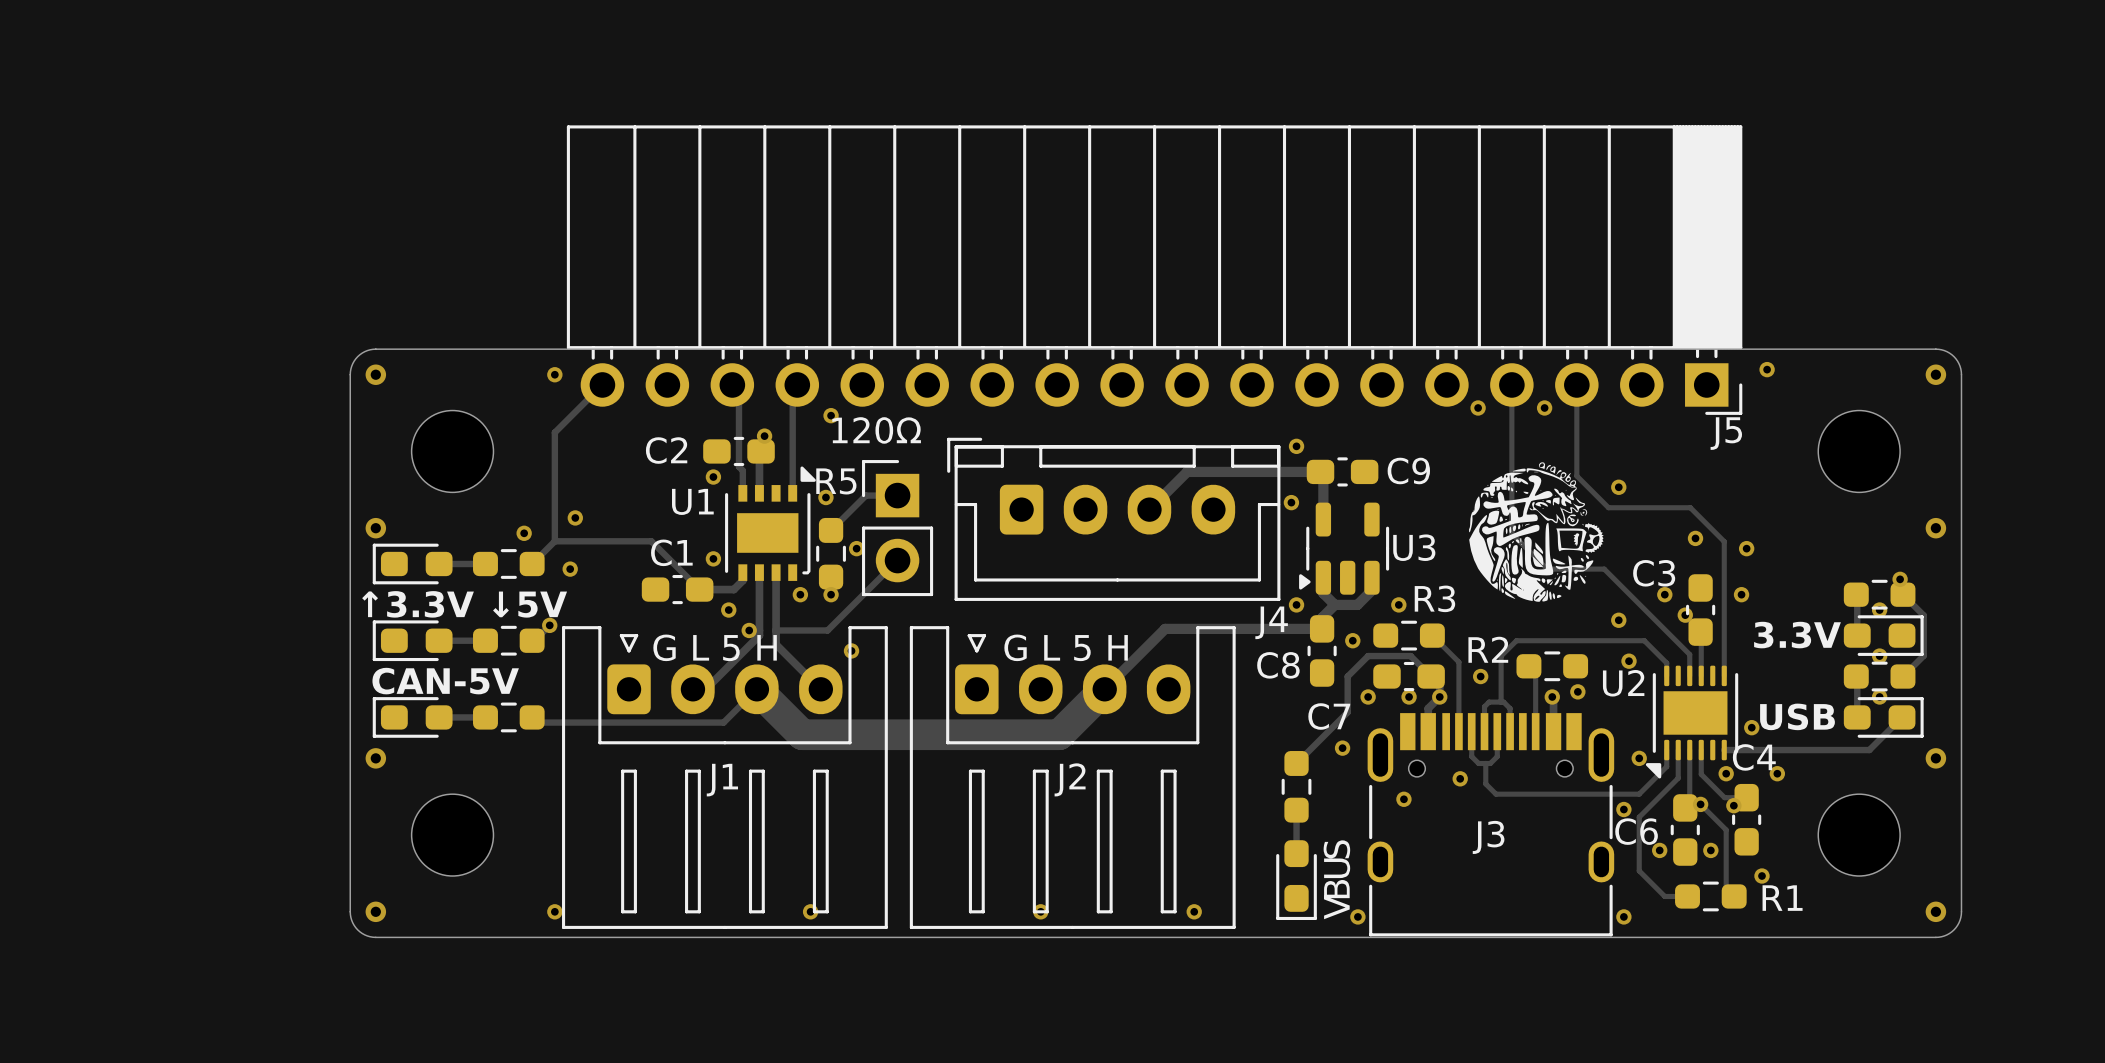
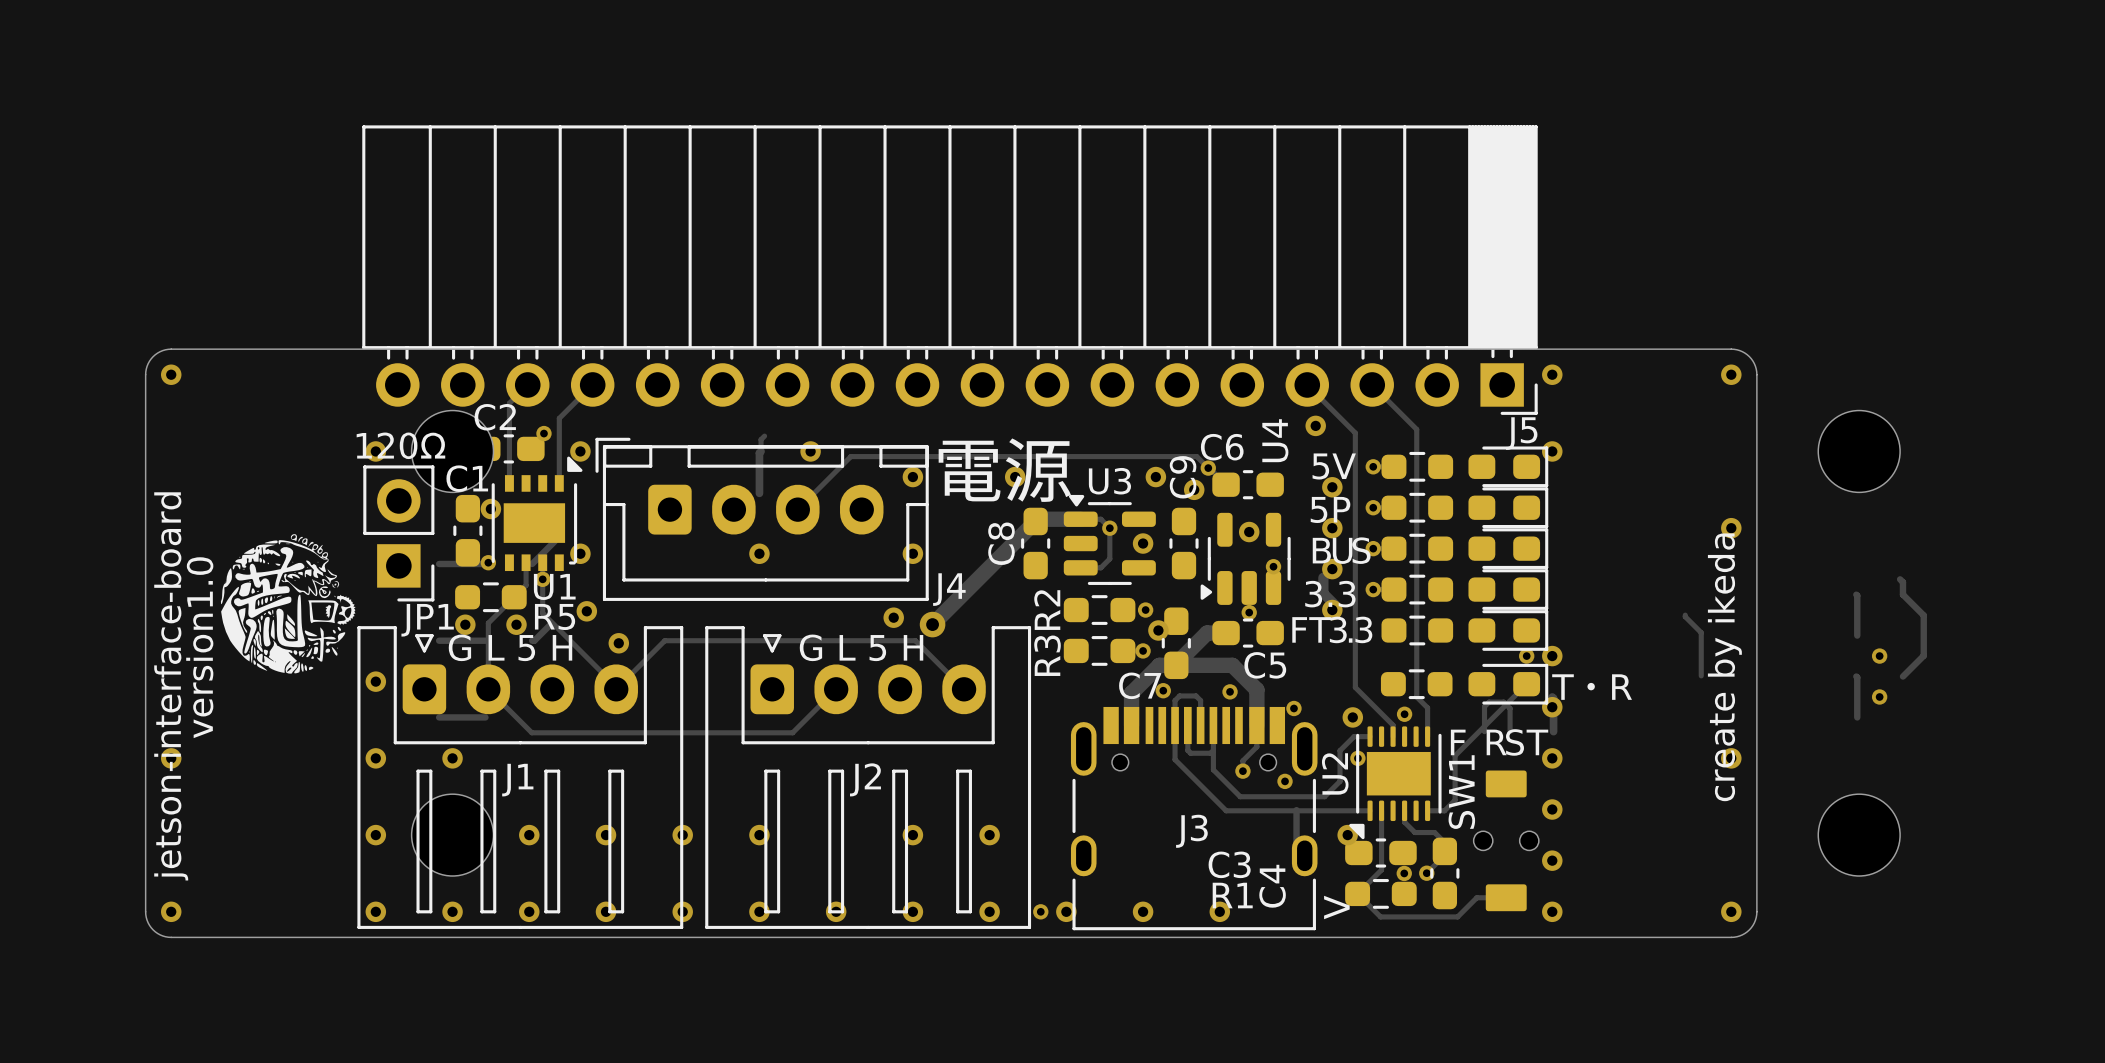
J5 position: (1154, 270) -> (949, 270)
board edge: (375, 349) (367, 350) (357, 356) (351, 366) (350, 374) (350, 911) (351, 920) (357, 929) (364, 934) (375, 937) -> (375, 349) (168, 349) (153, 356) (148, 363) (145, 374) (147, 920) (155, 931) (168, 937) (375, 937)
board edge: (1731, 349) (1938, 349) (1953, 356) (1958, 363) (1961, 374) (1960, 920) (1951, 931) (1938, 937) (1731, 937) -> (1731, 349) (1742, 351) (1749, 356) (1754, 363) (1756, 374) (1756, 911) (1754, 922) (1749, 929) (1742, 934) (1731, 937)
via: (1767, 369) -> none
via: none -> (171, 374)
via: (375, 374) -> none
via: (554, 374) -> none
via: none -> (1552, 374)
via: none -> (1731, 374)
via: (1935, 374) -> none
track: none -> (527, 384) (509, 403) (509, 483)
track: none -> (592, 384) (559, 418) (559, 483)
track: (602, 384) (554, 432) (554, 541) (651, 541) (699, 589) (733, 589) (742, 580) (742, 572) -> none
track: (732, 384) (738, 391) (738, 466) (742, 470) (742, 493) -> none
track: (797, 384) (792, 389) (792, 493) -> none
track: none -> (1307, 384) (1355, 433) (1355, 687) (1393, 725) (1393, 736)
track: none -> (1372, 384) (1416, 429) (1416, 696) (1427, 707) (1427, 736)
track: (1511, 384) (1511, 533) (1547, 569) (1604, 569) (1689, 654) (1689, 675) -> none
track: (1576, 384) (1576, 476) (1608, 507) (1690, 507) (1724, 541) (1724, 675) -> none
via: (1478, 407) -> none
via: (1544, 407) -> none
via: (831, 415) -> none
via: none -> (1315, 425)
text position: 120Ω (876, 430) -> 120Ω (400, 445)
via: none -> (543, 433)
via: (764, 436) -> none
via: (1296, 446) -> none
C2 name position: C2 (666, 450) -> C2 (495, 417)
via: none -> (375, 451)
via: none -> (580, 451)
C2 position: (738, 451) -> (508, 448)
via: none -> (810, 451)
via: none -> (1552, 451)
drawing: [1468, 462, 1604, 602] -> none
text: none -> 5V (1334, 466)
via: none -> (1373, 466)
part: none -> (1417, 466)
part: none -> (1508, 466)
via: none -> (1208, 468)
text: none -> 電源 (1004, 470)
C9 name position: C9 (1408, 470) -> C9 (1183, 477)
C9 rotation: 0° (1342, 471) -> 90° clockwise (1184, 543)
C9 position: (1342, 471) -> (1184, 543)
via: (713, 477) -> none
via: none -> (912, 477)
via: none -> (1015, 477)
via: none -> (1155, 477)
track: none -> (1224, 484) (1196, 456) (850, 456) (797, 509)
via: none -> (1332, 487)
via: (1618, 487) -> none
via: none -> (1194, 489)
track: (897, 495) (865, 495) (831, 530) -> none
via: (825, 497) -> none
U1 name position: U1 (692, 501) -> U1 (554, 586)
via: (1291, 502) -> none
via: none -> (1373, 507)
part: none -> (1417, 507)
part: none -> (1508, 507)
via: none -> (490, 509)
track: (1149, 509) (1187, 471) (1320, 471) (1323, 474) (1323, 519) -> none
text: none -> 5P (1330, 509)
via: (575, 517) -> none
J4 position: (1113, 519) -> (762, 519)
U1 position: (770, 523) -> (537, 513)
via: (375, 528) -> none
part: (897, 528) -> none
via: none -> (1109, 528)
via: none -> (1332, 528)
via: none -> (1731, 528)
via: (1935, 528) -> none
via: none -> (1249, 532)
JP1: none -> (398, 533)
via: (524, 533) -> none
drawing: none -> [220, 534, 356, 674]
via: (1695, 538) -> none
via: none -> (1143, 543)
U3 name position: U3 (1414, 547) -> U3 (1109, 481)
via: (856, 548) -> none
U3 rotation: 0° (1344, 548) -> 90° clockwise (1109, 539)
U3 position: (1344, 548) -> (1109, 539)
via: none -> (1373, 548)
part: none -> (1417, 548)
part: none -> (1508, 548)
via: (1746, 548) -> none
text: none -> S (1361, 550)
via: none -> (759, 553)
R5 rotation: 0° (831, 553) -> 90° clockwise (490, 597)
R5 position: (831, 553) -> (490, 597)
via: none -> (912, 553)
via: (713, 558) -> none
U4: none -> (1245, 558)
track: (897, 560) (827, 630) (776, 630) -> none
via: none -> (488, 562)
track: none -> (526, 562) (526, 585) (488, 623) (488, 689) (531, 732) (792, 732) (836, 689)
track: none -> (542, 562) (542, 613) (616, 686) (616, 689) (664, 640) (915, 640) (964, 689)
part: (412, 563) -> none
part: (508, 563) -> none
via: none -> (1273, 566)
track: none -> (1080, 567) (1100, 567) (1109, 558) (1109, 528) (1100, 519) (1037, 519) (932, 624)
via position: (570, 569) -> (580, 553)
via: none -> (1332, 569)
track: (759, 572) (759, 635) (705, 689) (692, 689) -> none
track: (776, 572) (776, 644) (820, 689) -> none
C3 name position: C3 (1654, 573) -> C3 (1229, 864)
track: (1371, 577) (1371, 590) (1357, 604) (1334, 604) (1322, 617) (1322, 628) (1165, 628) (1059, 734) (802, 734) (756, 689) (723, 722) (537, 722) (532, 717) -> none
via: none -> (542, 579)
via: (1900, 579) -> none
C1 rotation: 0° (677, 589) -> 90° clockwise (467, 530)
C1 position: (677, 589) -> (467, 530)
via: none -> (1373, 589)
part: none -> (1417, 589)
part: none -> (1508, 589)
via: (800, 594) -> none
via: (831, 594) -> none
text: none -> 3.3 (1330, 594)
via: (1664, 594) -> none
via: (1741, 594) -> none
part: (1879, 594) -> none
R3 name rotation: 0° (1434, 598) -> 90° counterclockwise (1047, 655)
R3 name position: R3 (1434, 598) -> R3 (1047, 655)
text: ↑3.3V ↓5V (464, 604) -> none
via: (1296, 604) -> none
via: (1398, 604) -> none
via: (728, 610) -> none
via: none -> (1145, 610)
via: none -> (1332, 610)
C3 rotation: 0° (1700, 610) -> 90° clockwise (1380, 852)
C3 position: (1700, 610) -> (1380, 852)
via: (1879, 610) -> none
via: none -> (586, 611)
via: none -> (1249, 612)
via: (1685, 615) -> none
via: none -> (893, 617)
via: (1618, 620) -> none
J4 name position: J4 (1271, 622) -> J4 (949, 589)
via: none -> (465, 624)
via: none -> (516, 624)
via: none -> (932, 624)
via: (549, 625) -> none
text: none -> F (1299, 629)
text: none -> T (1320, 629)
text: none -> 3 (1338, 629)
text: none -> 3 (1363, 629)
via: (749, 630) -> none
via: none -> (1158, 630)
part: none -> (1417, 630)
part: none -> (1508, 630)
track: none -> (1226, 633) (1207, 633) (1176, 665)
C5: none -> (1248, 633)
R3 position: (1409, 635) -> (1099, 650)
track: (1432, 635) (1458, 662) (1458, 731) -> none
text: 3.3V (1797, 635) -> none
part: (1883, 635) -> none
part: (412, 640) -> none
part: (508, 640) -> none
text: none -> . (1350, 640)
via: (1352, 640) -> none
via: none -> (618, 643)
text: none -> version1.0 (199, 647)
text: none -> G L 5 H (510, 647)
text position: G L 5 H (715, 647) -> G L 5 H (861, 647)
text: G L 5 H (1066, 647) -> none
R2 name rotation: 0° (1488, 649) -> 90° counterclockwise (1047, 610)
via: (851, 650) -> none
via: none -> (1143, 650)
C8 position: (1322, 650) -> (1035, 543)
via: none -> (1526, 656)
via: none -> (1552, 656)
via: (1629, 661) -> none
C8 name rotation: 0° (1278, 665) -> 90° counterclockwise (1001, 543)
track: (1528, 666) (1535, 673) (1535, 731) -> none
R2 position: (1552, 666) -> (1099, 610)
text: none -> create by ikeda (1724, 667)
track: (1666, 675) (1666, 663) (1644, 640) (1516, 640) (1501, 656) (1501, 702) -> none
C7 rotation: 0° (1409, 676) -> 90° clockwise (1176, 643)
C7 position: (1409, 676) -> (1176, 643)
via: (1480, 676) -> none
part: (1879, 676) -> none
via: none -> (375, 681)
text: CAN-5V (445, 681) -> none
U2 name rotation: 0° (1623, 683) -> 90° counterclockwise (1335, 773)
part: none -> (1416, 684)
part: none -> (1508, 684)
track: none -> (1526, 684) (1455, 755) (1455, 800) (1444, 810) (1427, 810)
text: none -> jetson-interface-board (171, 686)
text: none -> T・R (1592, 687)
via size: [1544, 689, 1560, 705] -> [1542, 696, 1563, 718]
via: none -> (1163, 690)
via: none -> (1230, 691)
via: (1577, 691) -> none
via: (1368, 696) -> none
via position: (1409, 696) -> (1404, 714)
via: (1439, 696) -> none
via: none -> (1293, 708)
text: USB (1797, 716) -> none
part: (412, 717) -> none
part: (508, 717) -> none
via: none -> (1352, 717)
part: (1883, 717) -> none
track: (1902, 717) (1869, 750) (1724, 750) -> none
U2 position: (1692, 722) -> (1395, 782)
track: none -> (1131, 725) (1131, 693) (1159, 665) (1232, 665) (1256, 689) (1256, 746) (1242, 760) (1242, 771)
track: none -> (1187, 725) (1187, 750) (1190, 753) (1210, 753) (1213, 750)
track: none -> (1200, 725) (1200, 700) (1196, 695) (1179, 695) (1175, 700) (1175, 759) (1226, 810) (1370, 810)
track: none -> (1213, 725) (1213, 769) (1240, 796) (1324, 796) (1340, 781) (1340, 750) (1354, 736) (1370, 736)
via: (1751, 727) -> none
track: (1428, 731) (1428, 708) (1439, 696) (1439, 685) (1410, 656) (1368, 656) (1347, 676) (1347, 712) (1296, 763) -> none
track: (1471, 731) (1471, 756) (1478, 763) (1490, 763) (1497, 756) (1497, 731) -> none
text: none -> F (1458, 742)
text: none -> R (1496, 742)
text: none -> S (1515, 742)
text: none -> T (1537, 742)
via position: (1342, 748) -> (1357, 758)
track: (1666, 750) (1666, 766) (1639, 794) (1496, 794) (1485, 783) (1485, 763) -> none
track: (1678, 750) (1678, 778) (1639, 817) (1639, 870) (1664, 896) (1687, 896) -> none
track: (1689, 750) (1689, 803) (1685, 807) (1704, 807) (1726, 829) (1726, 888) (1734, 896) -> none
track: (1701, 750) (1701, 774) (1724, 797) (1746, 797) -> none
C4 name rotation: 0° (1754, 757) -> 90° counterclockwise (1272, 886)
C4 name position: C4 (1754, 757) -> C4 (1272, 886)
via: none -> (171, 758)
via: none -> (452, 758)
via: none -> (1552, 758)
via: (1639, 758) -> none
via: (1935, 758) -> none
via: none -> (1242, 771)
via position: (1726, 773) -> (1731, 758)
via: (1777, 773) -> none
J1 position: (724, 777) -> (520, 777)
J2 position: (1072, 777) -> (868, 777)
via: (1460, 778) -> none
via: none -> (1285, 781)
part: (1296, 786) -> none
via: (1403, 799) -> none
via: (1700, 804) -> none
via: (1733, 805) -> none
via: none -> (1552, 809)
via: (1623, 809) -> none
track: none -> (1381, 810) (1381, 869) (1357, 893) (1380, 916) (1457, 916) (1476, 897) (1506, 897)
track: none -> (1404, 810) (1404, 822) (1414, 832) (1434, 832) (1444, 842) (1444, 855) (1426, 873)
C4 position: (1746, 819) -> (1444, 873)
J3 position: (1490, 824) -> (1194, 818)
C6 rotation: 0° (1685, 829) -> 90° clockwise (1248, 484)
C6 position: (1685, 829) -> (1248, 484)
via: none -> (375, 835)
via: none -> (529, 835)
via: none -> (606, 835)
via: none -> (682, 835)
via: none -> (759, 835)
via: none -> (912, 835)
via: none -> (989, 835)
via: none -> (1347, 835)
SW1: none -> (1506, 840)
text: S (1336, 849) -> none
via: (1659, 850) -> none
via: (1710, 850) -> none
via: none -> (1552, 860)
text rotation: 0° (1337, 868) -> 90° clockwise (1342, 550)
text position: U (1337, 868) -> U (1342, 550)
via: none -> (1404, 873)
via: none -> (1426, 873)
via: (1761, 876) -> none
part: (1296, 880) -> none
text rotation: 0° (1336, 889) -> 90° clockwise (1321, 550)
text position: B (1336, 889) -> B (1321, 550)
R1 position: (1710, 896) -> (1380, 893)
R1 name position: R1 (1782, 898) -> R1 (1232, 895)
via: none -> (171, 911)
via: none -> (452, 911)
via: none -> (529, 911)
via: (554, 911) -> none
via: none -> (606, 911)
via: none -> (682, 911)
via: none -> (759, 911)
via: (810, 911) -> none
via: none -> (836, 911)
via: none -> (912, 911)
via: none -> (989, 911)
via: none -> (1066, 911)
via: none -> (1143, 911)
via: (1194, 911) -> none
via: none -> (1219, 911)
via: none -> (1552, 911)
via: none -> (1731, 911)
via: (1935, 911) -> none
via: (1357, 916) -> none
via: (1623, 916) -> none

